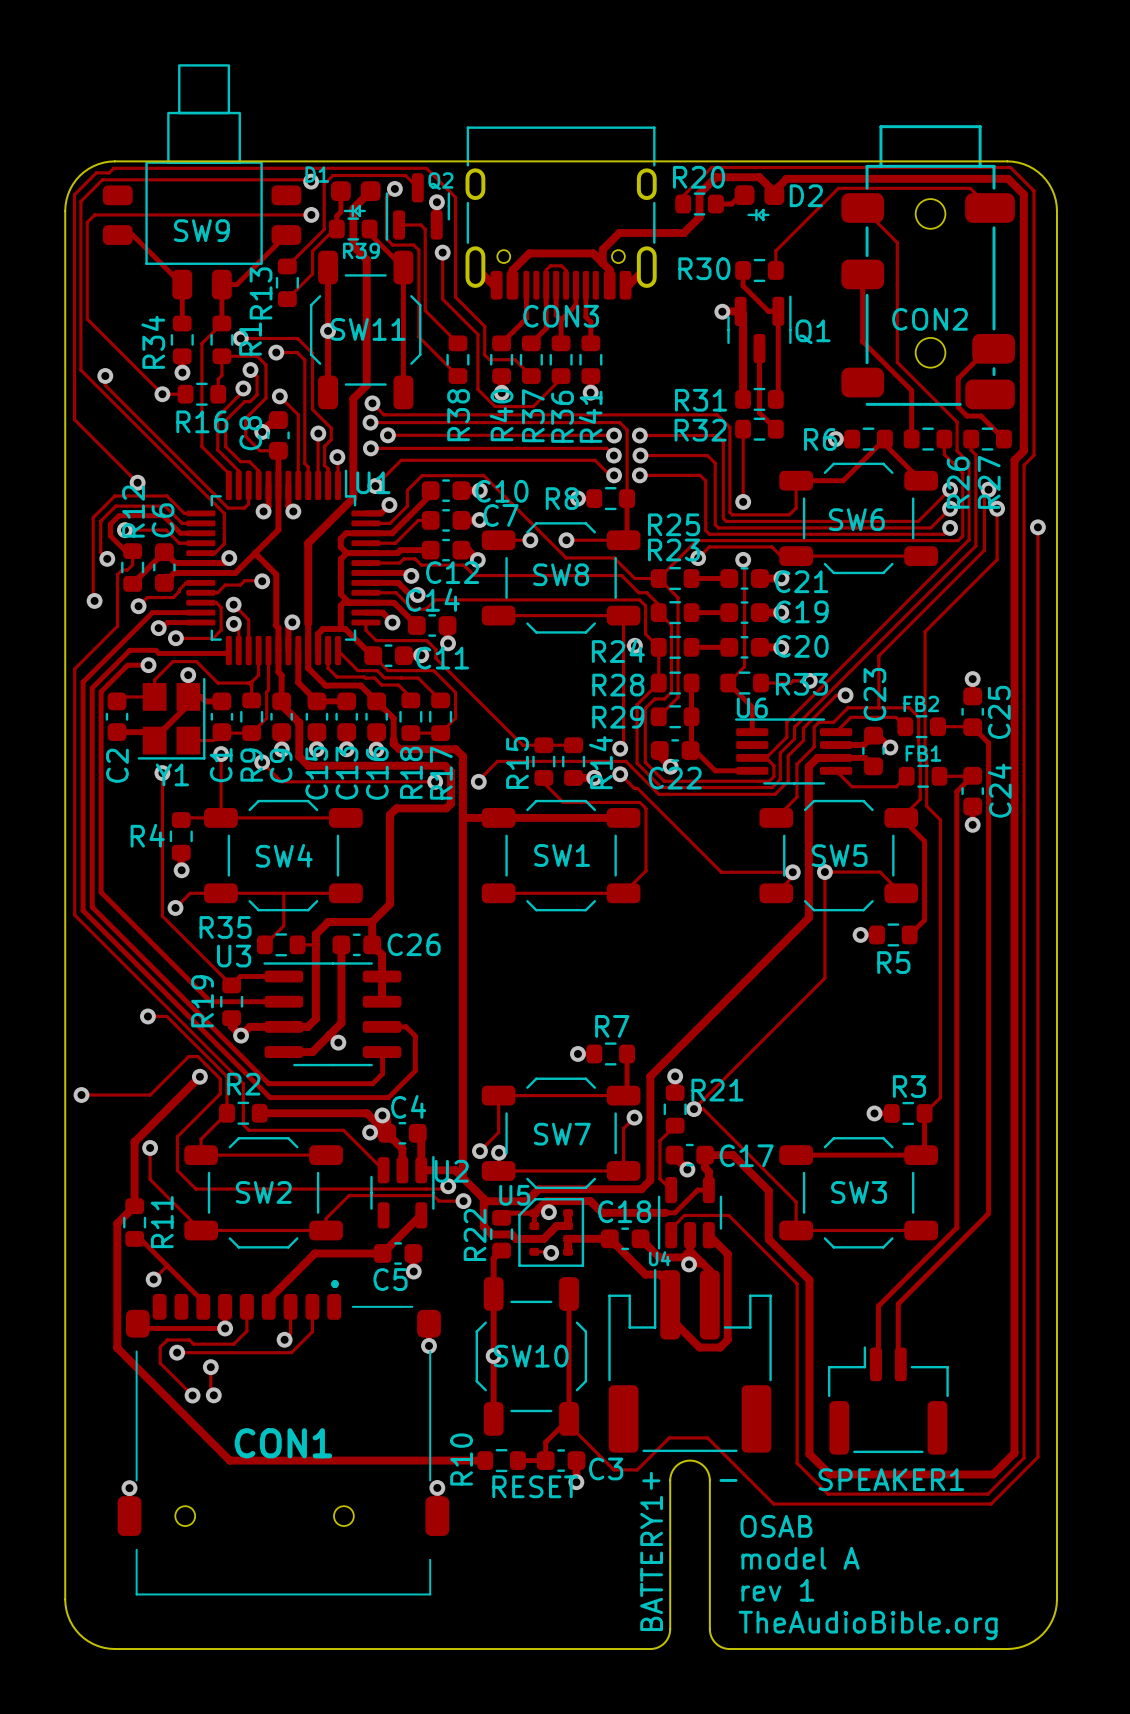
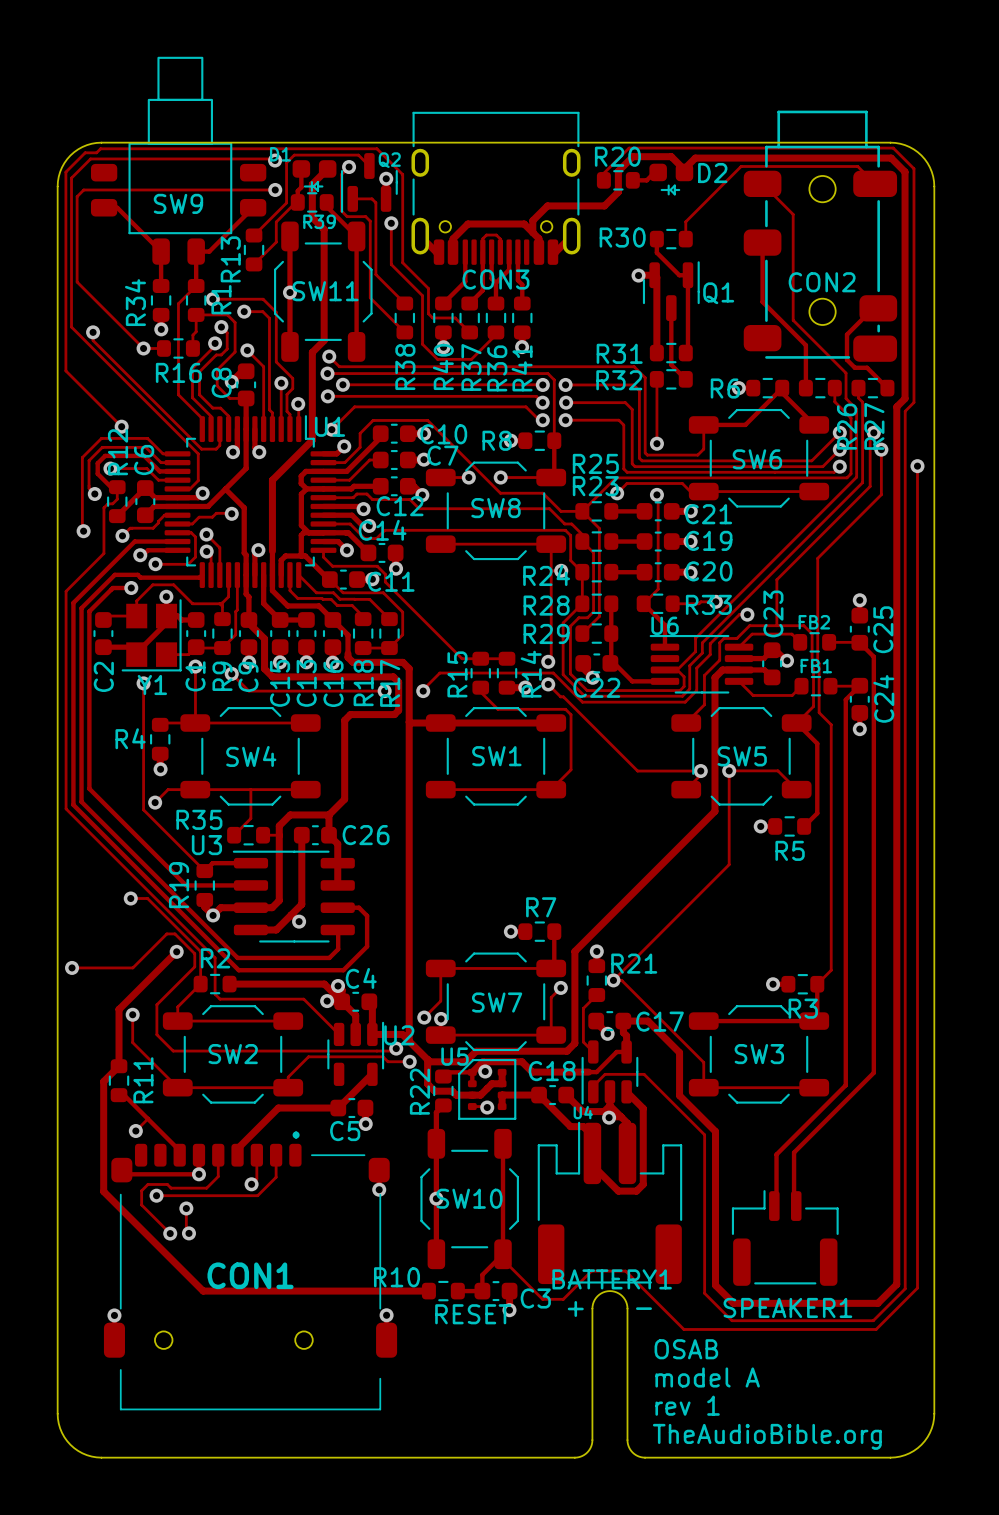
R3 name position: R3 (909, 1086) -> R3 (803, 1008)
R10 name rotation: 0° (461, 1459) -> 90° clockwise (396, 1277)
BATTERY1 name rotation: 0° (651, 1563) -> 90° clockwise (612, 1279)

